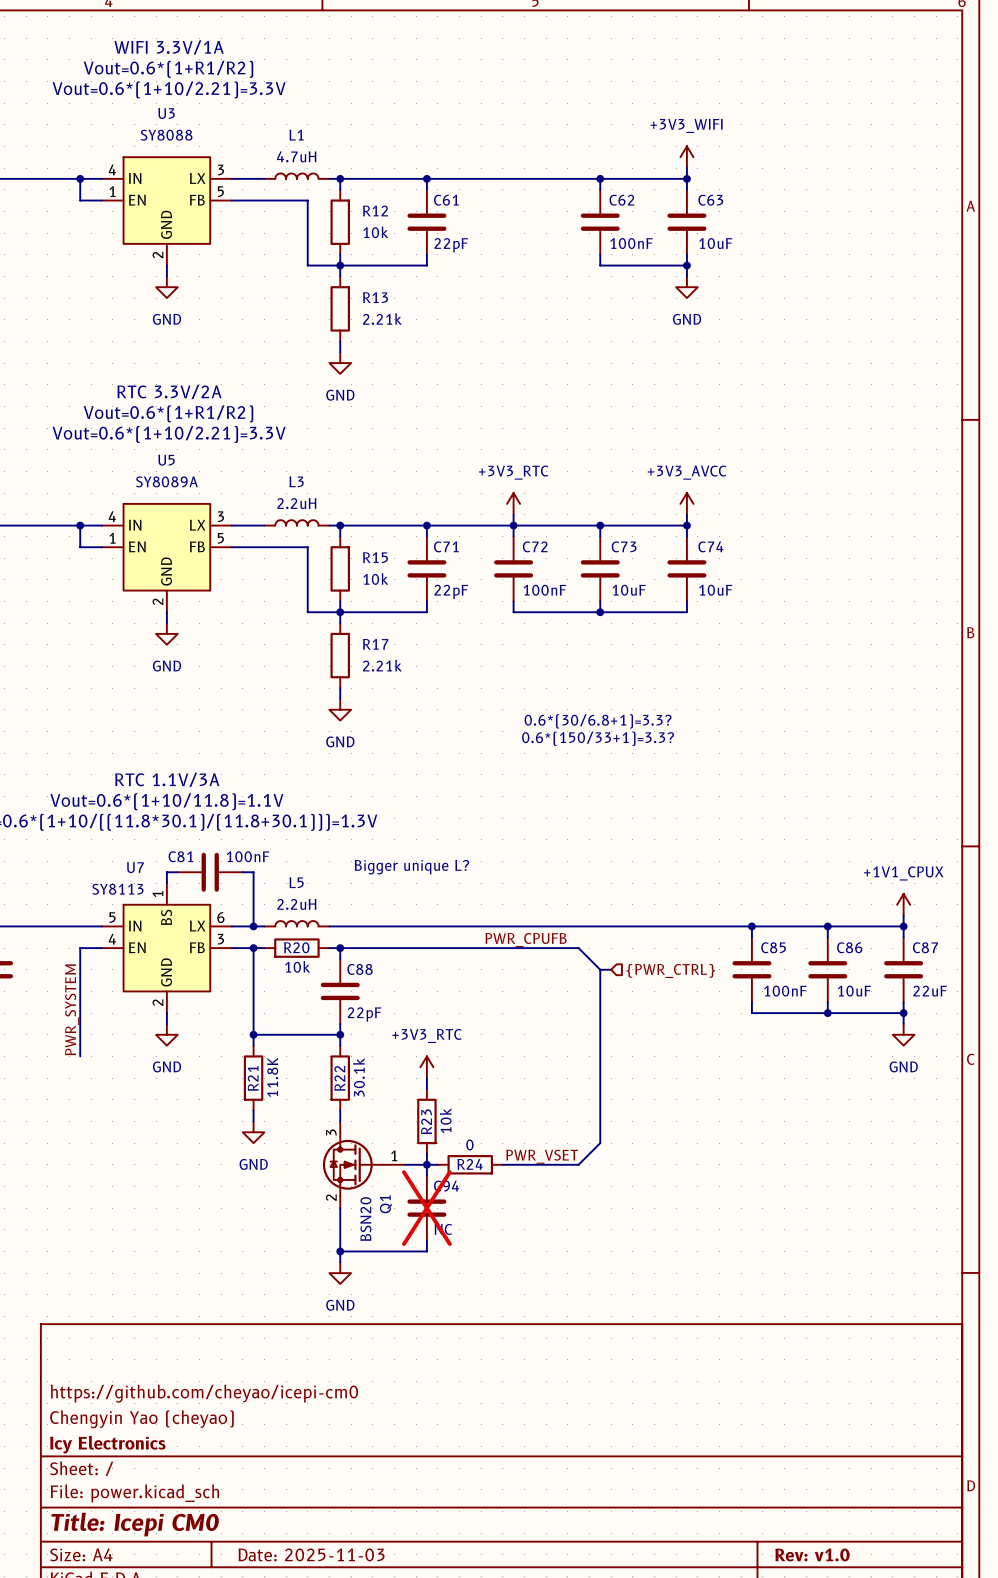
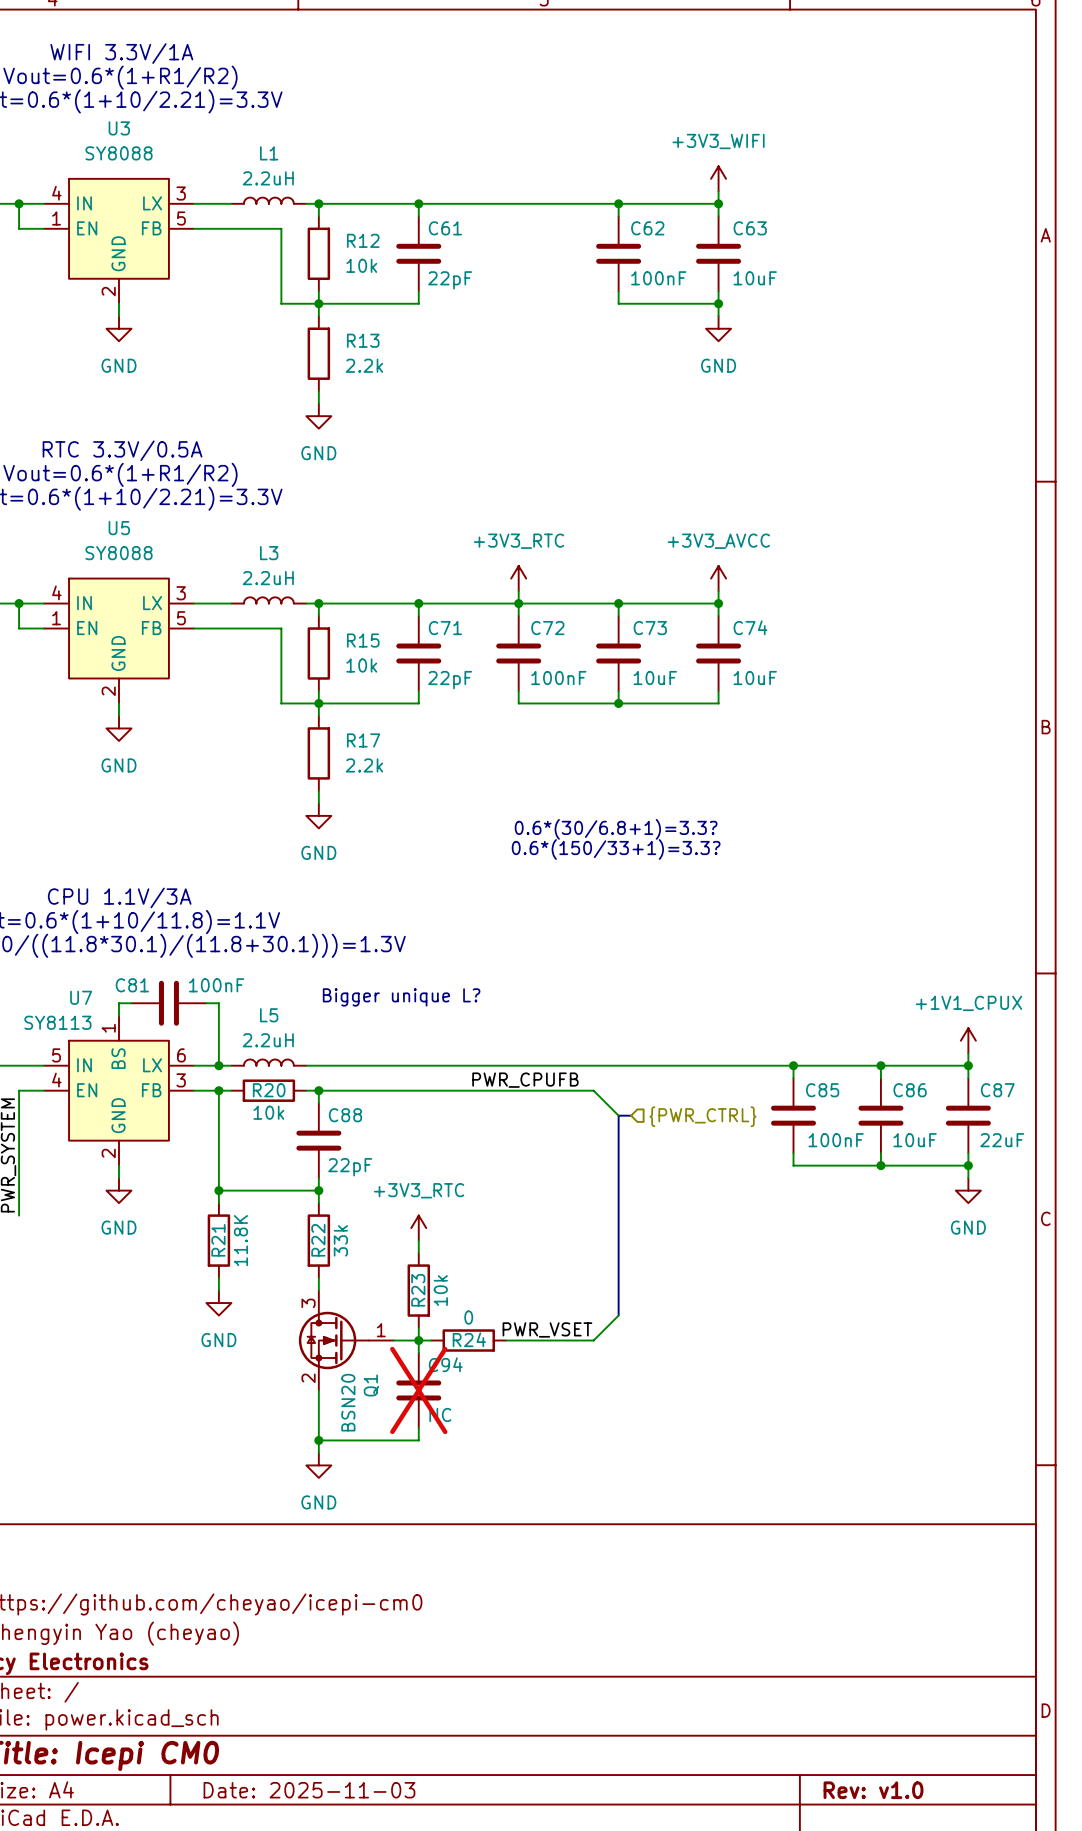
L1 value: 4.7uH (296, 156) -> 2.2uH (268, 178)
R13 value: 2.21k (382, 319) -> 2.2k (364, 365)
text: RTC 3.3V/2A (169, 391) -> RTC 3.3V/0.5A (122, 450)
U5 value: SY8089A (166, 481) -> SY8088 (118, 553)
R17 value: 2.21k (382, 665) -> 2.2k (364, 765)
text: RTC 1.1V/3A (167, 779) -> CPU 1.1V/3A (119, 897)
R22 value: 30.1k (359, 1077) -> 33k (340, 1240)

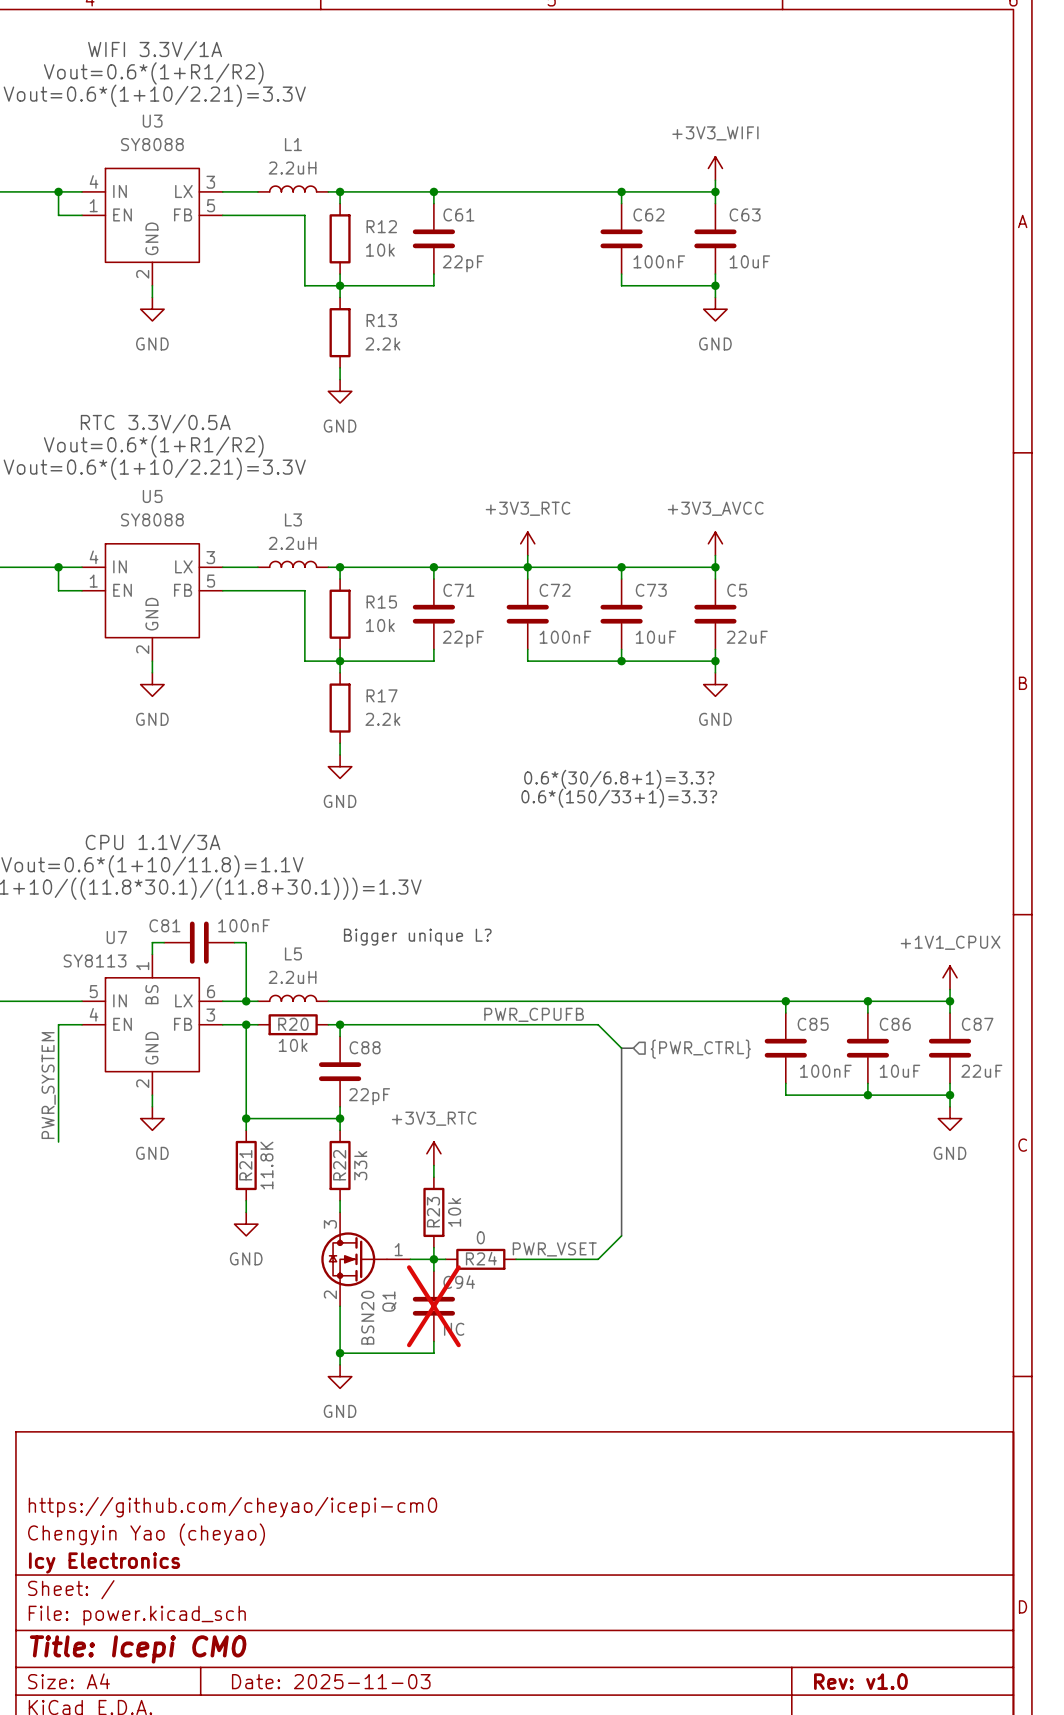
C74 name: C74 (750, 627) -> C5 (737, 590)
C74 value: 10uF (755, 678) -> 22uF (747, 637)
wire: none -> (715, 661) (715, 672)
junction: none -> (715, 661)
power symbol: none -> GND (715, 684)

